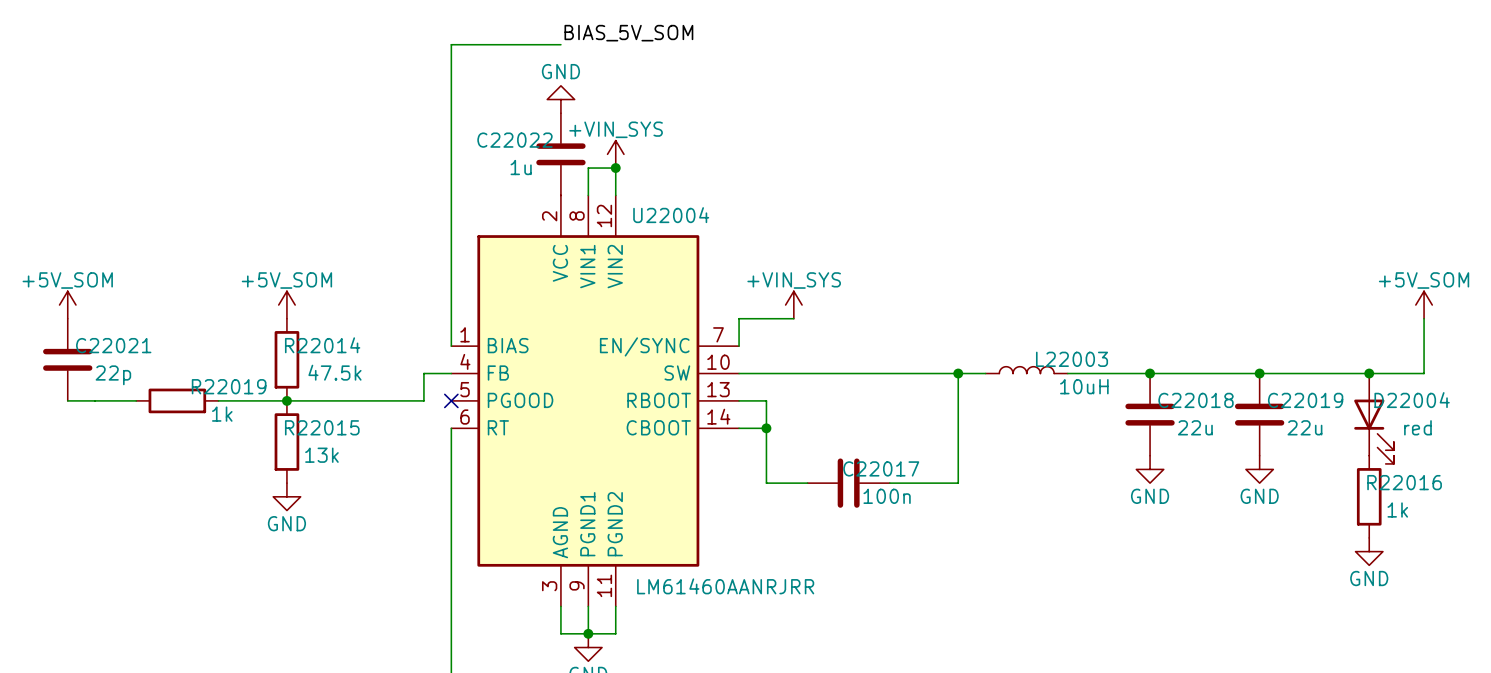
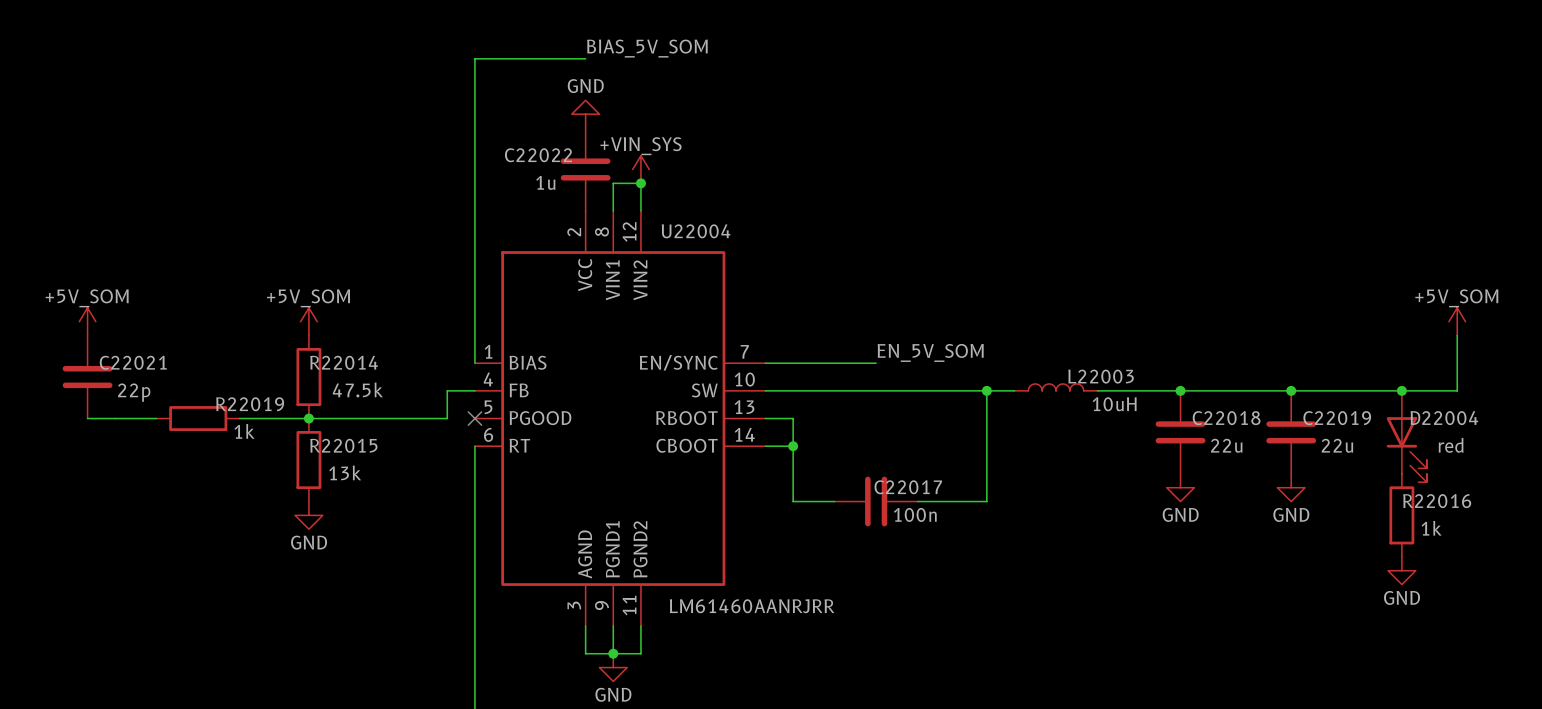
power symbol: +VIN_SYS (793, 305) -> none
wire: (793, 318) (739, 318) (739, 346) -> (876, 363) (765, 363)
label: none -> EN_5V_SOM (930, 352)

